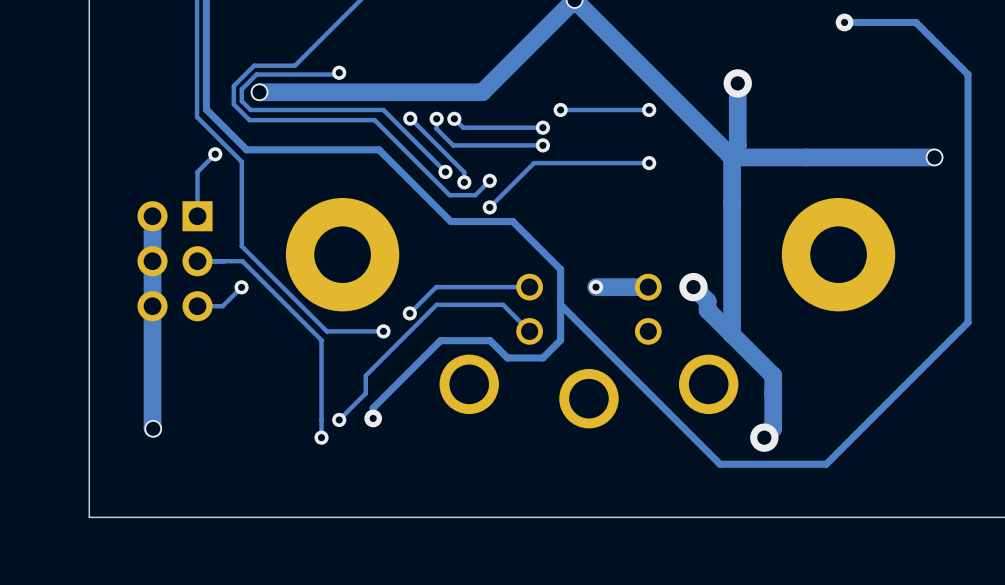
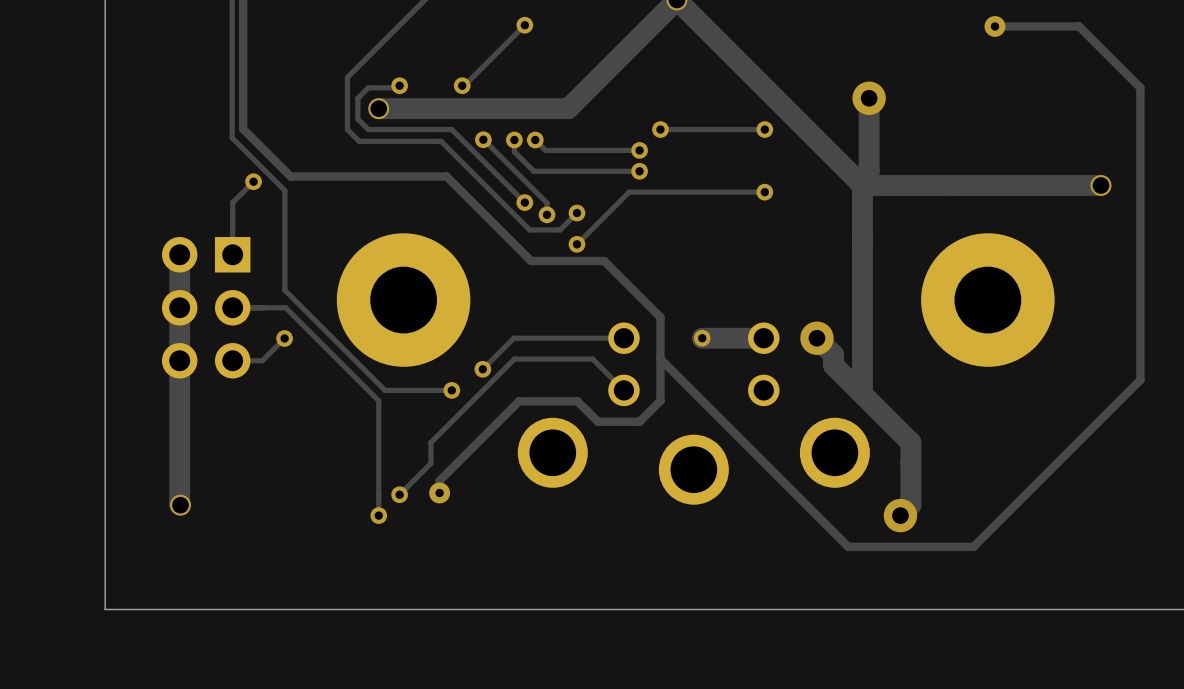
track: none -> (524, 25) (462, 87) (462, 85)
via: none -> (524, 25)
track: (294, 65) (254, 65) (233, 86) (233, 104) (249, 120) (374, 120) -> (347, 77) (347, 129) (359, 141) (441, 141)
via: none -> (462, 85)
track: (312, 74) (256, 74) (241, 89) (241, 101) (250, 109) (312, 109) -> (368, 87) (357, 98) (357, 119) (368, 129)
via position: (259, 92) -> (378, 108)
track: (321, 92) (259, 92) -> none

